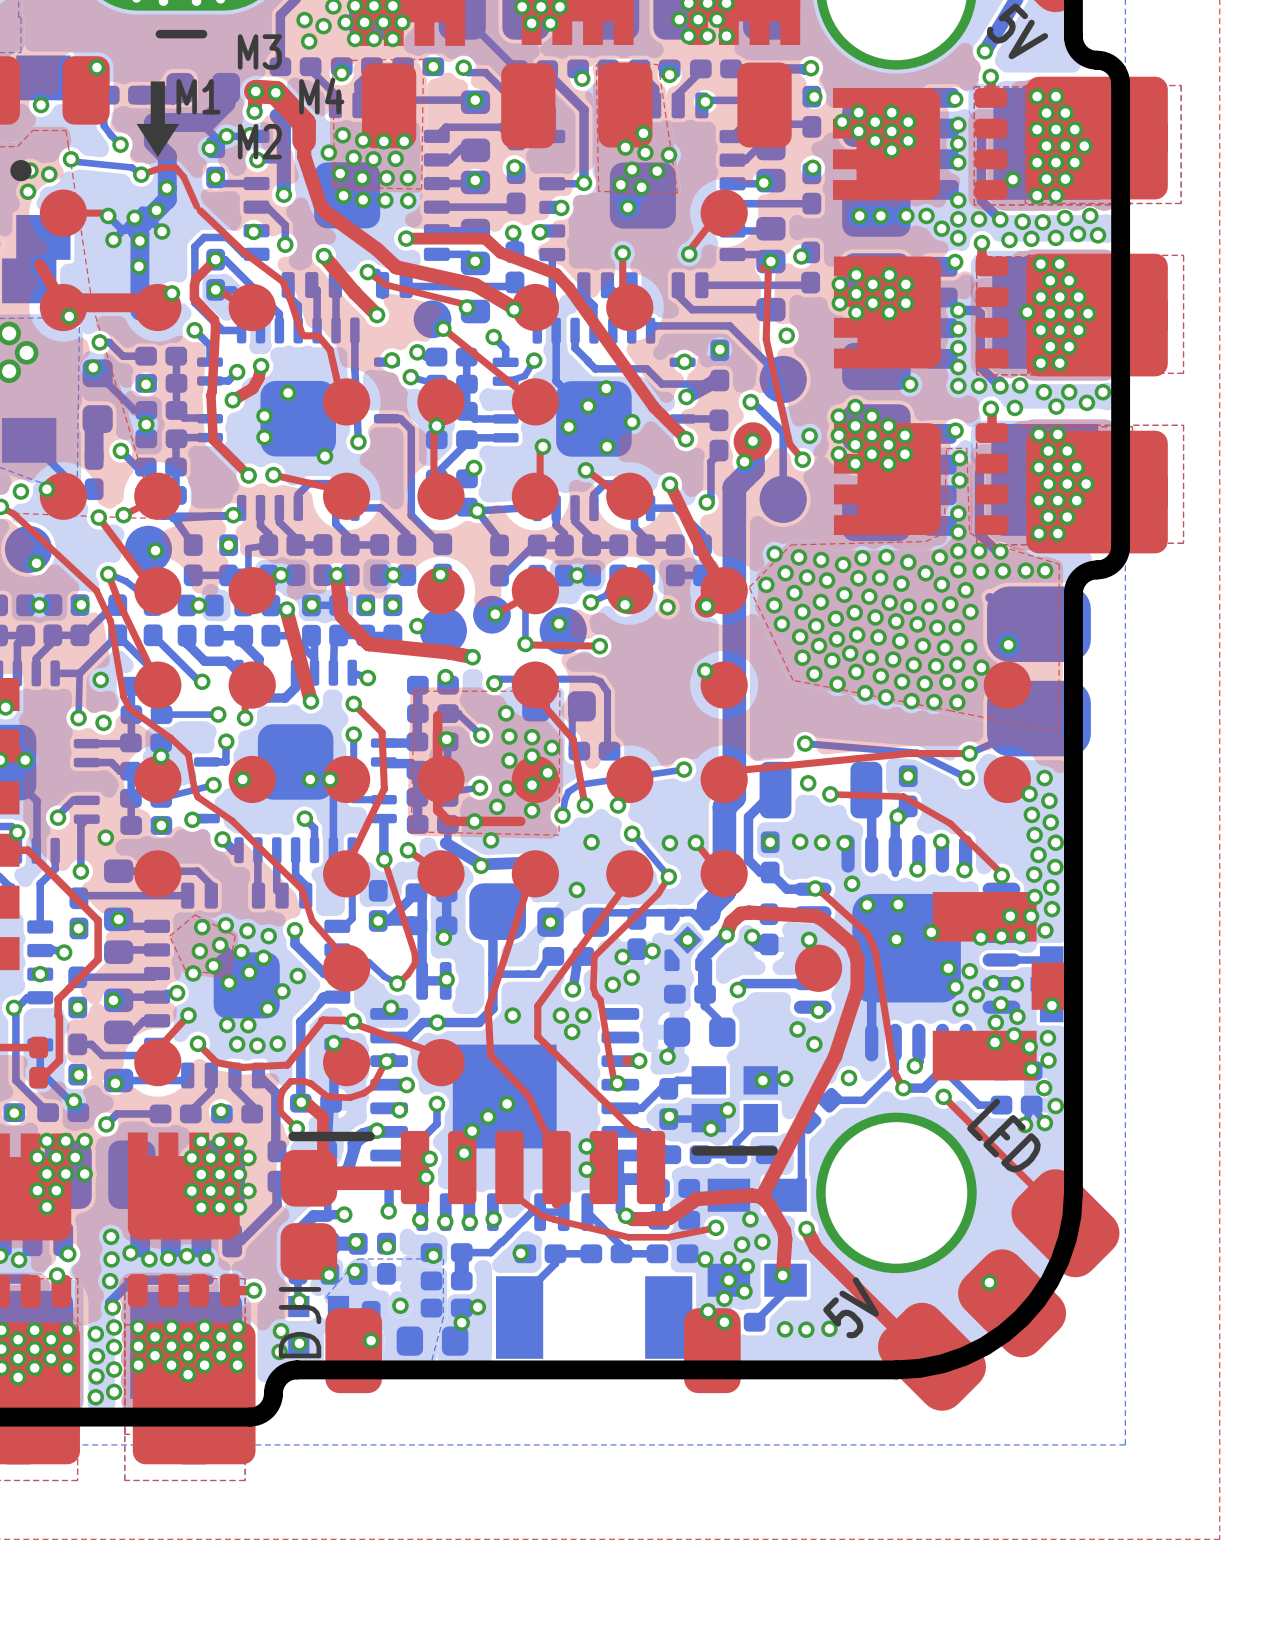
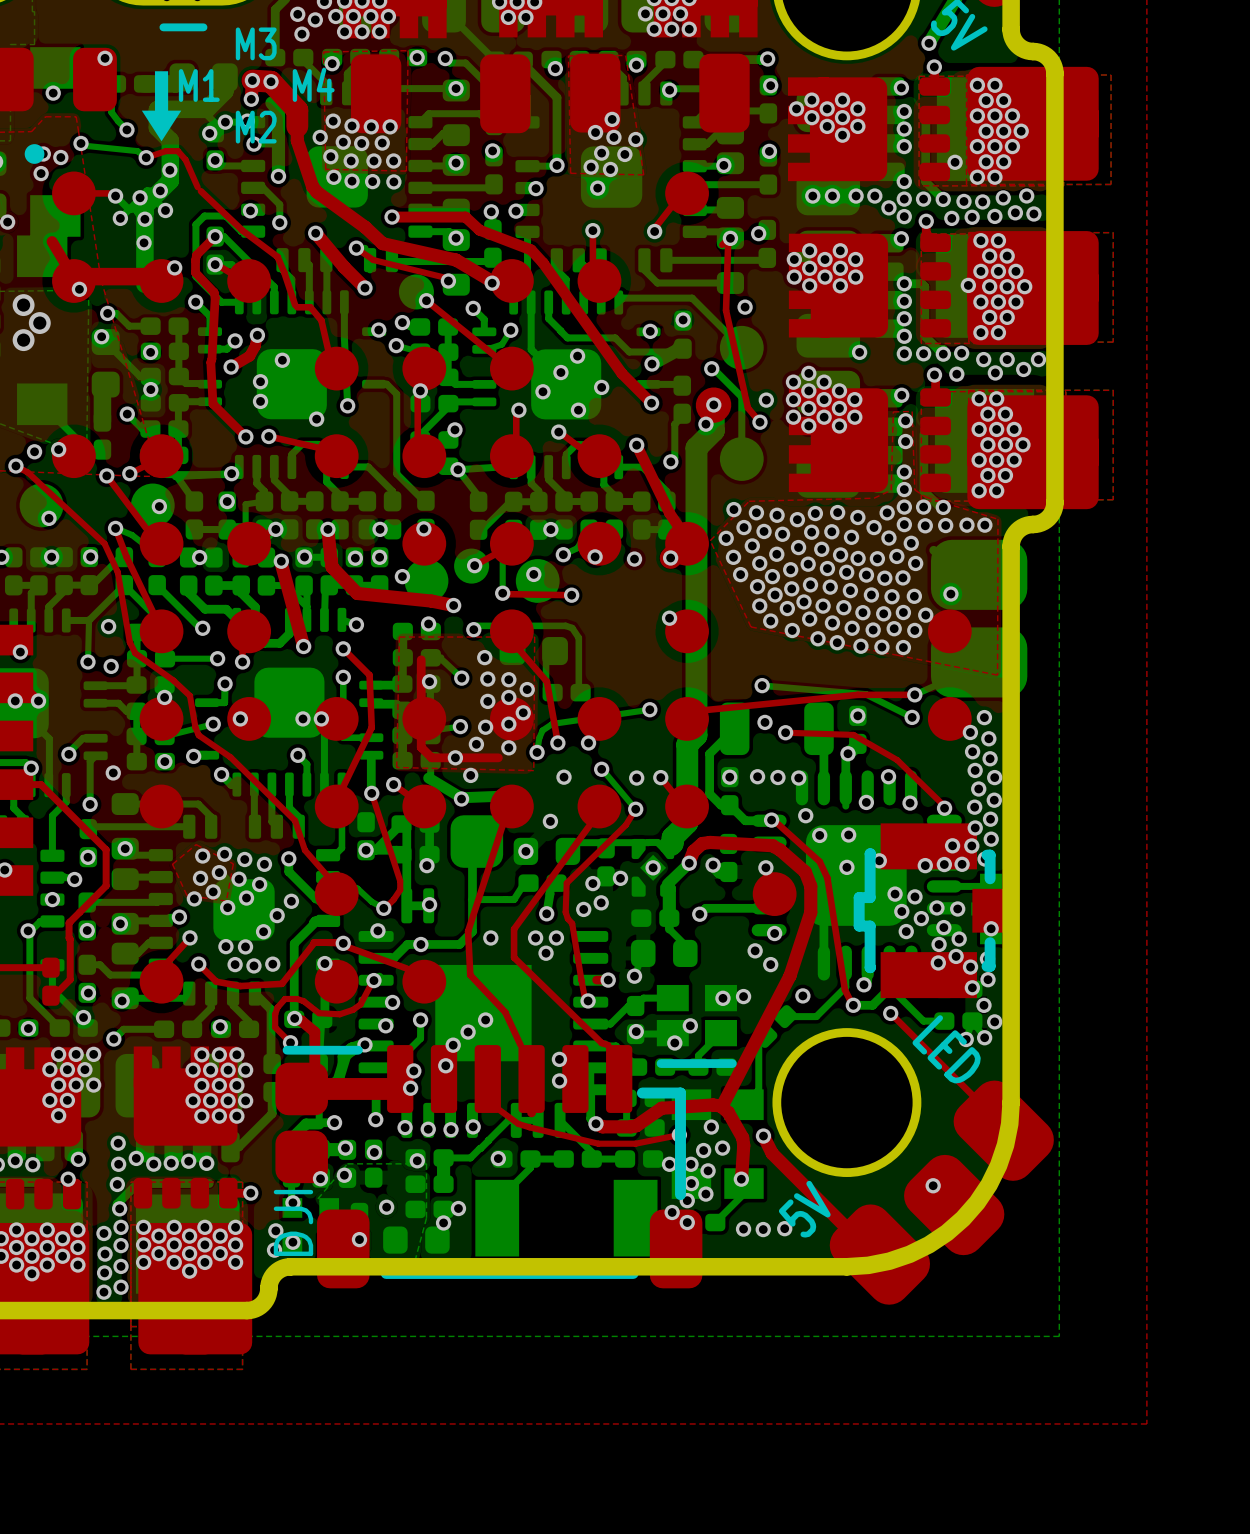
part footprint: [932, 892, 1082, 1081] -> [853, 823, 1019, 999]
part footprint: [325, 1130, 741, 1394] -> [317, 1045, 703, 1289]

